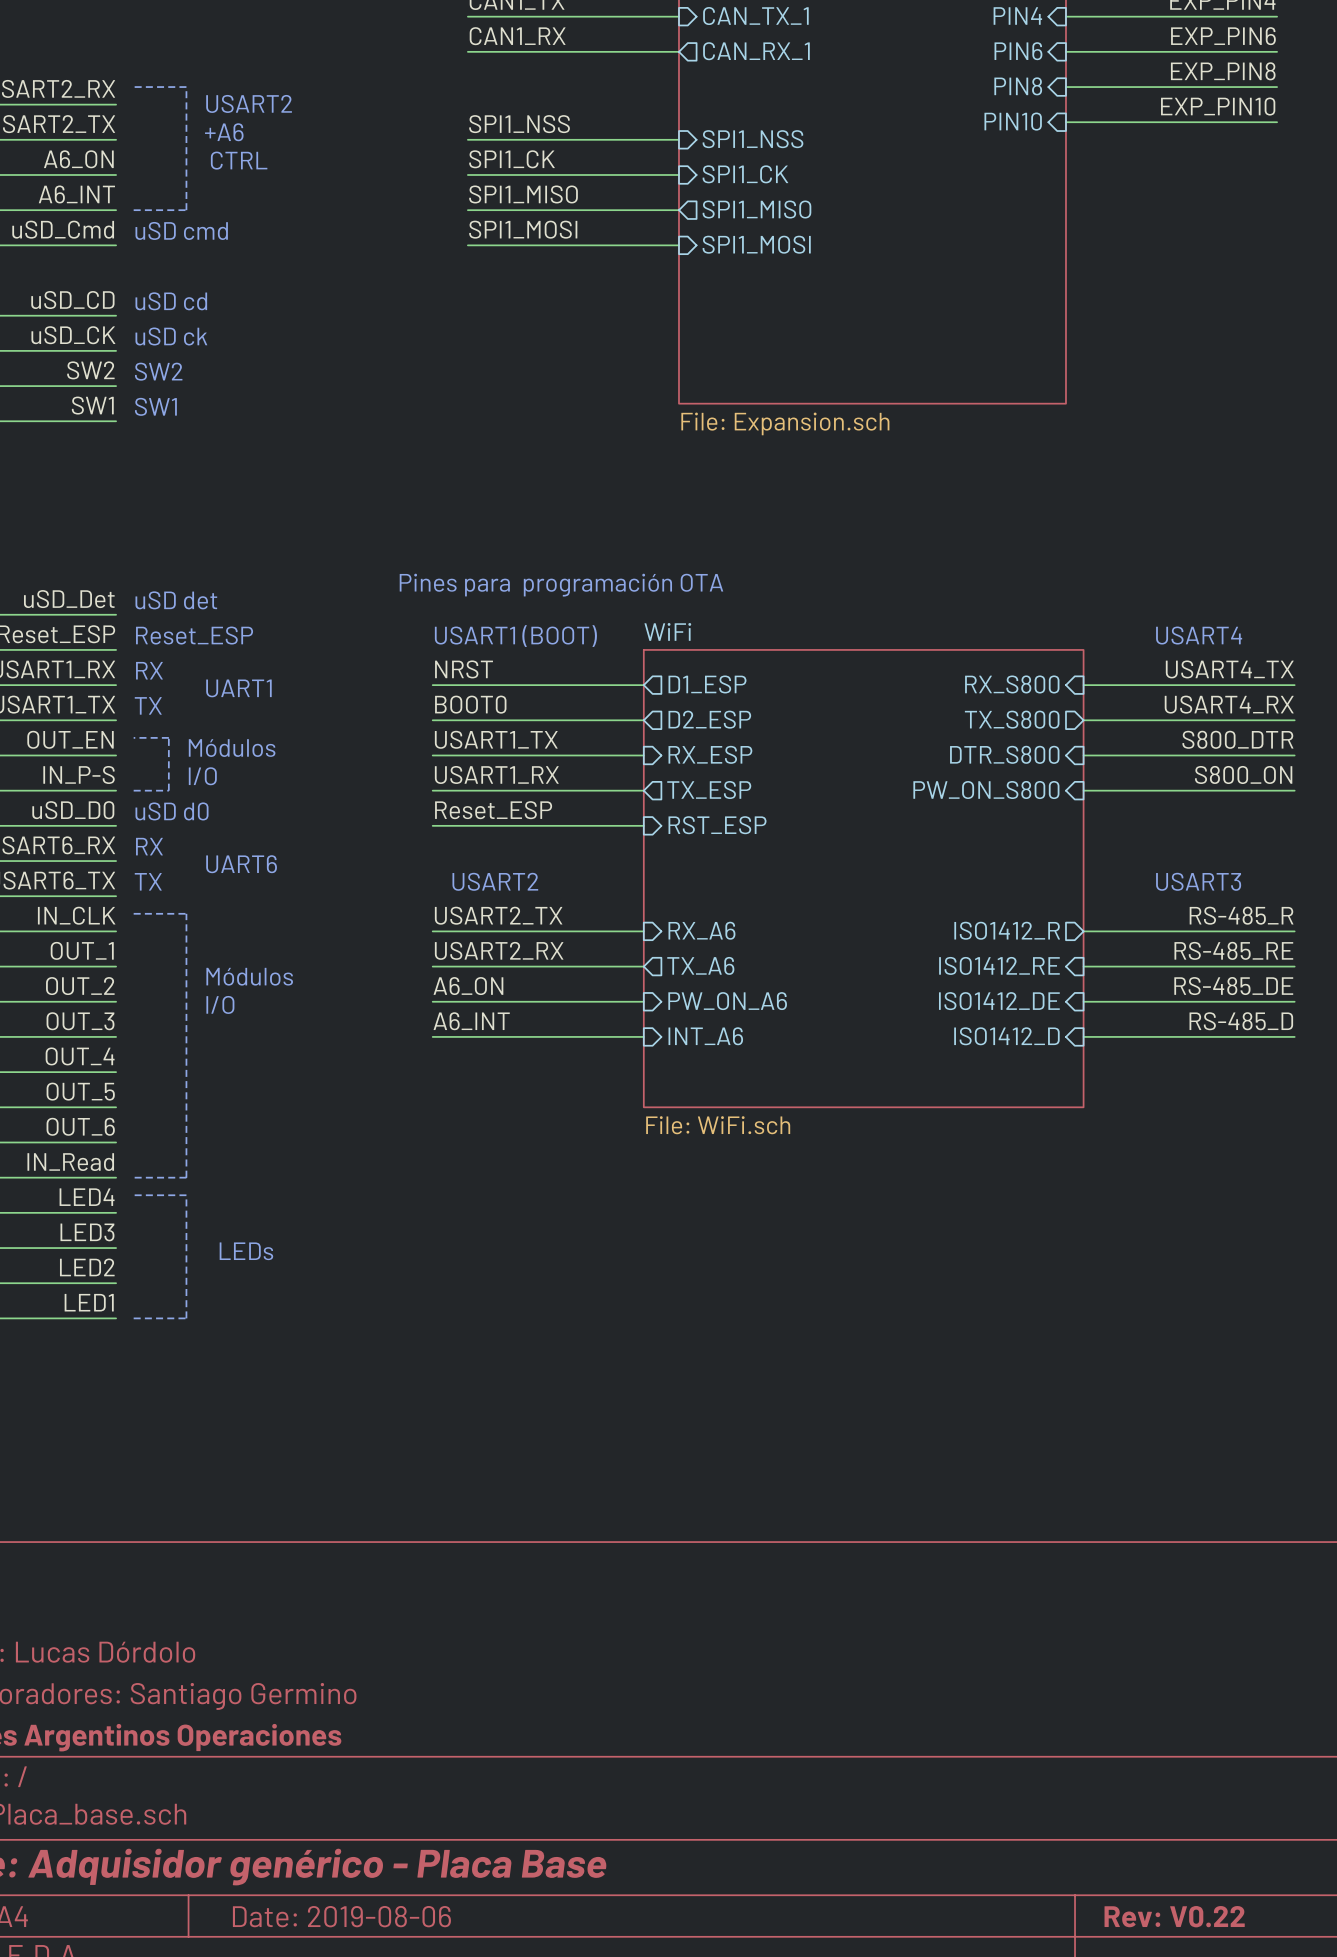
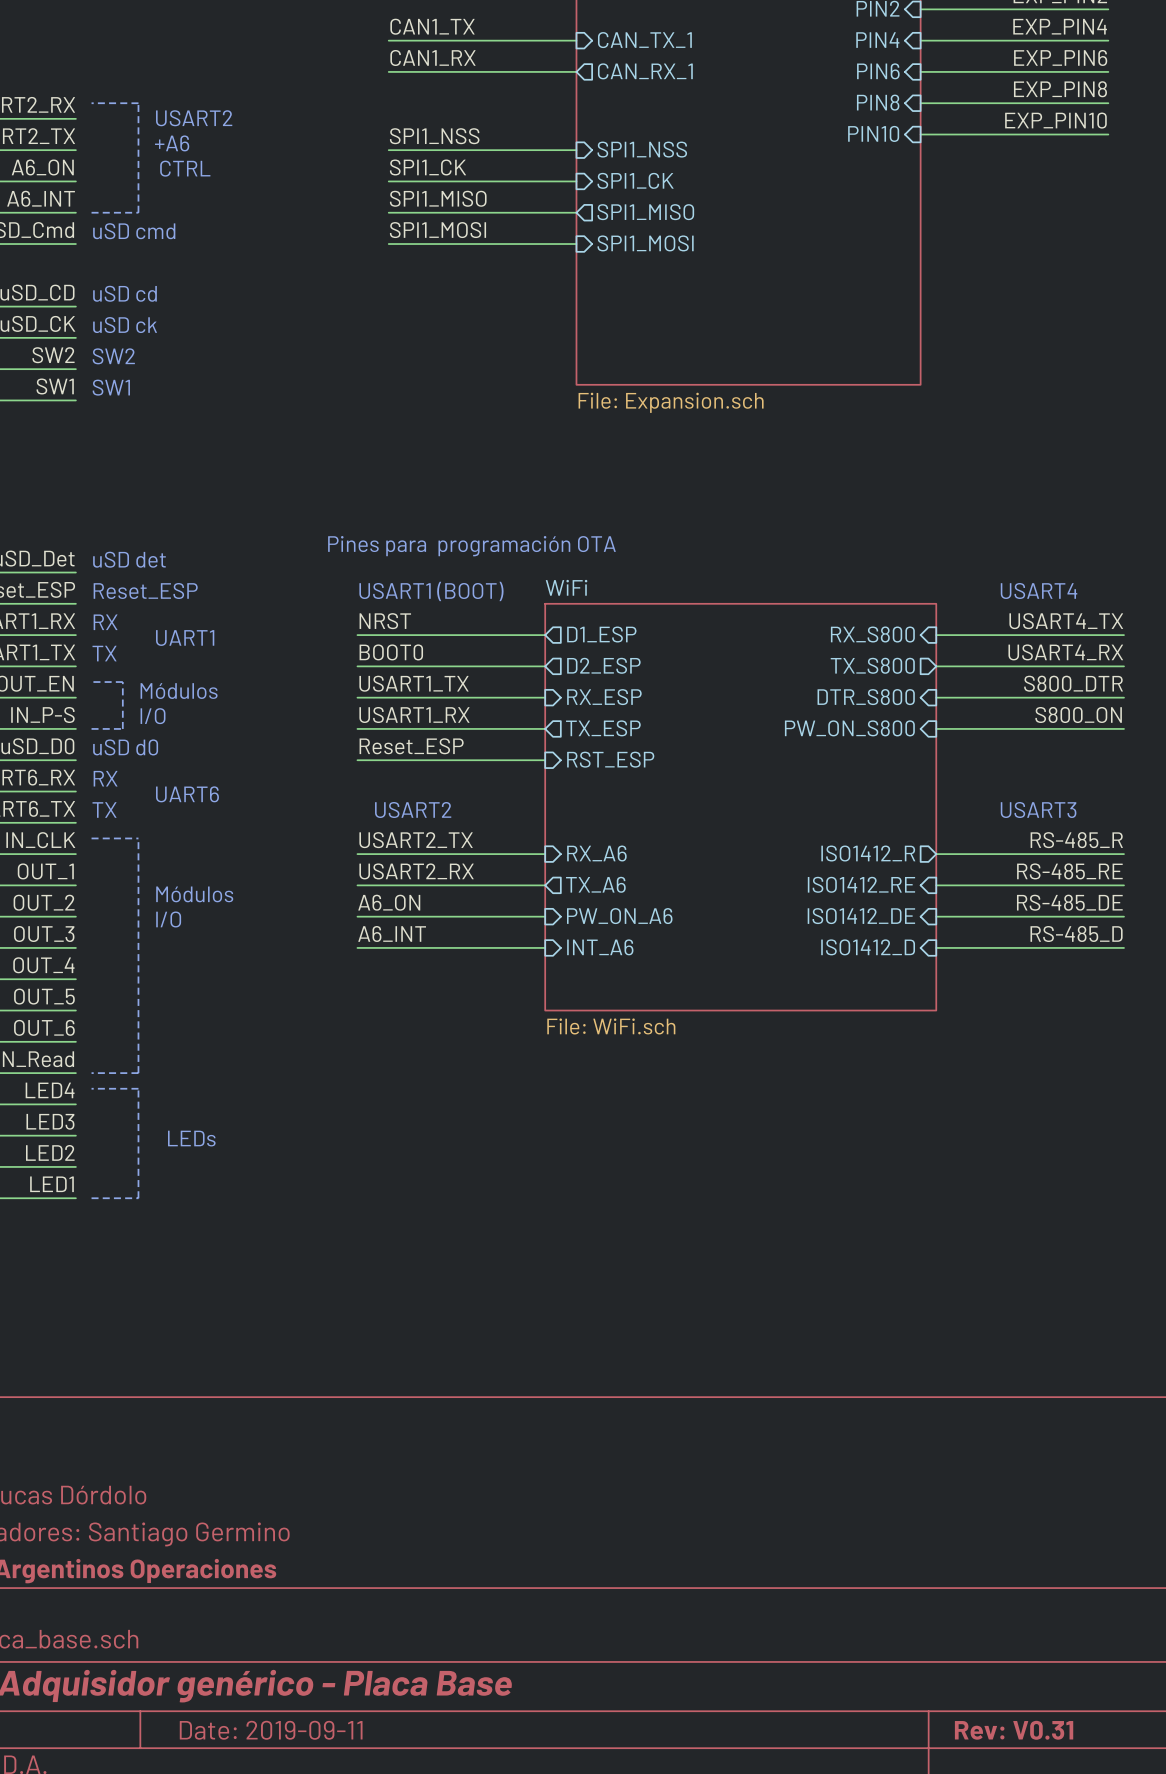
title block: Date: 2019-08-06 (341, 1916) -> Date: 2019-09-11 (271, 1730)
title block: Rev: V0.22 (1174, 1916) -> Rev: V0.31 (1014, 1730)

